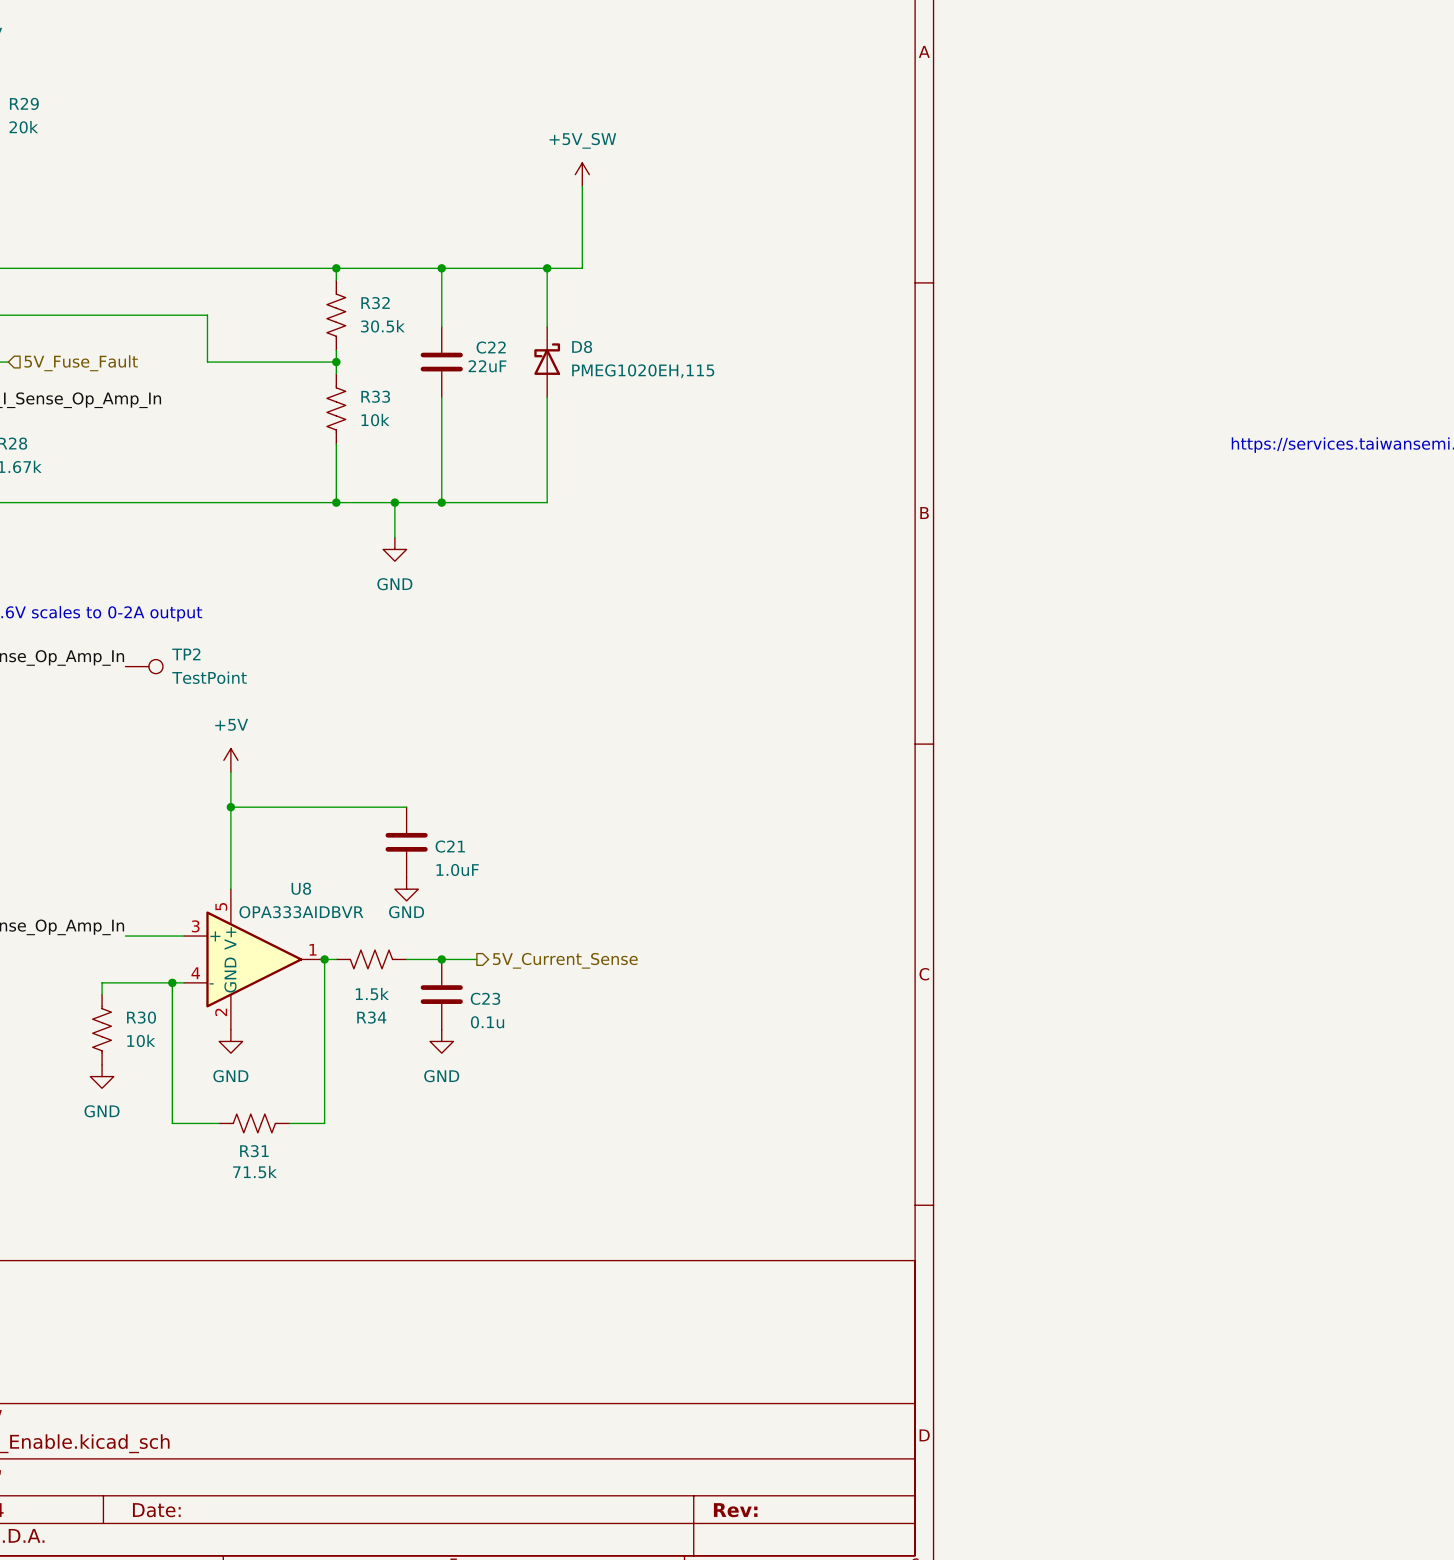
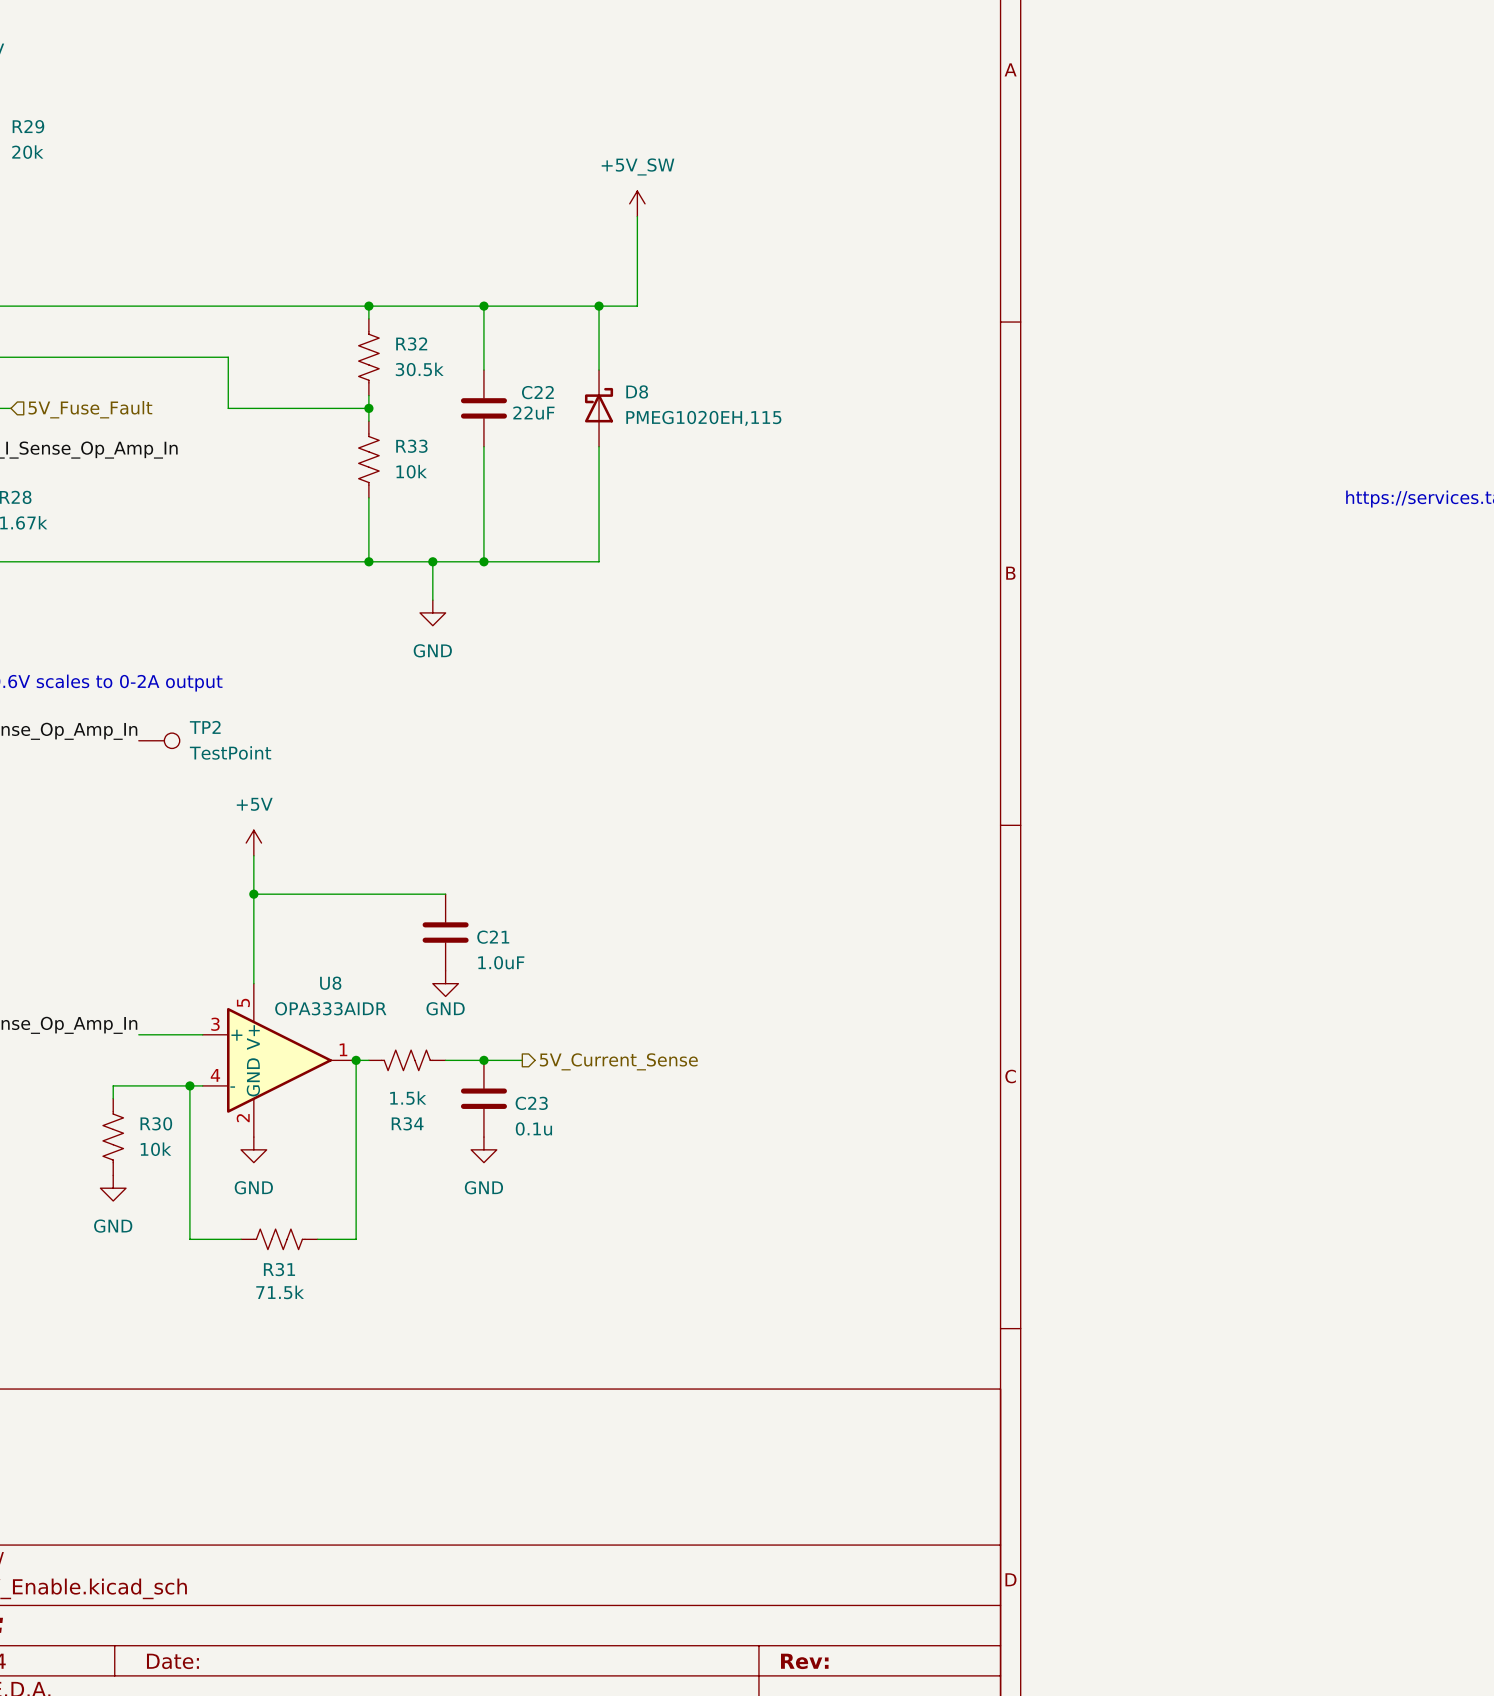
U8 value: OPA333AIDBVR (301, 912) -> OPA333AIDR (330, 1008)

